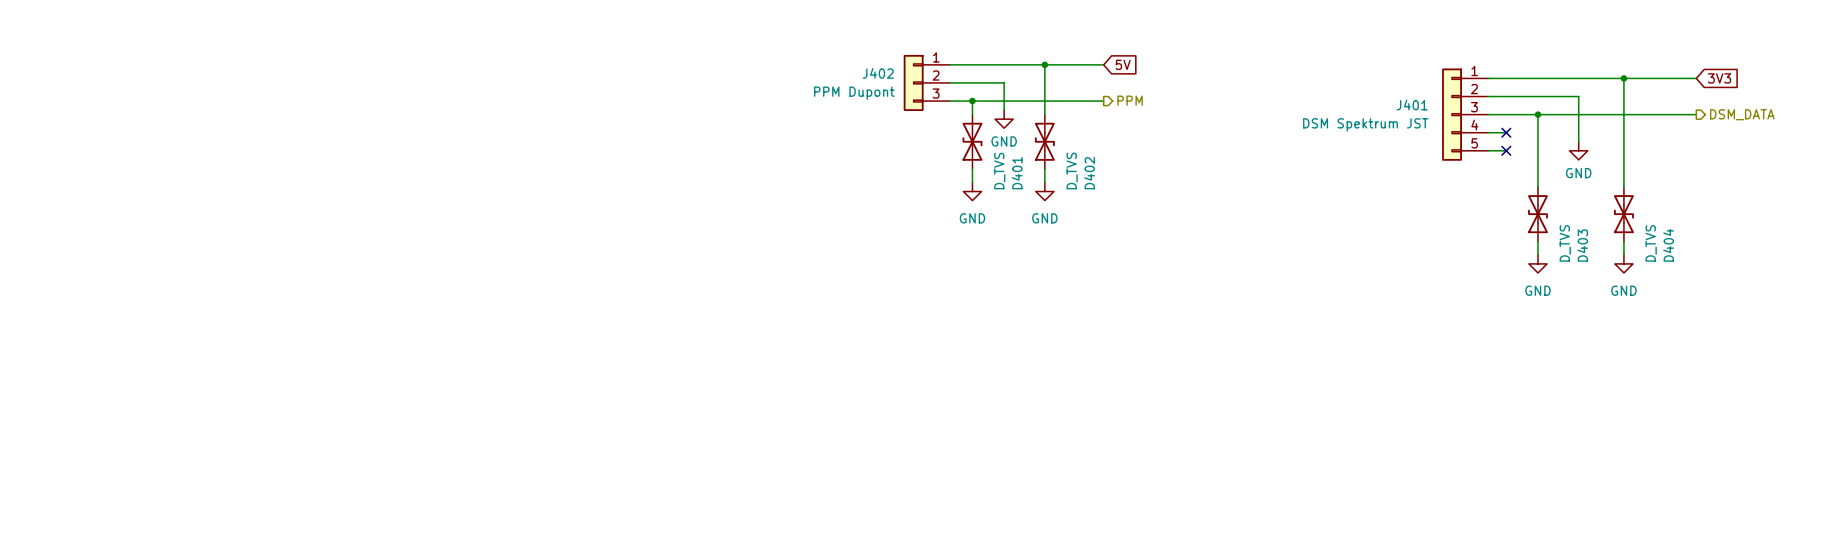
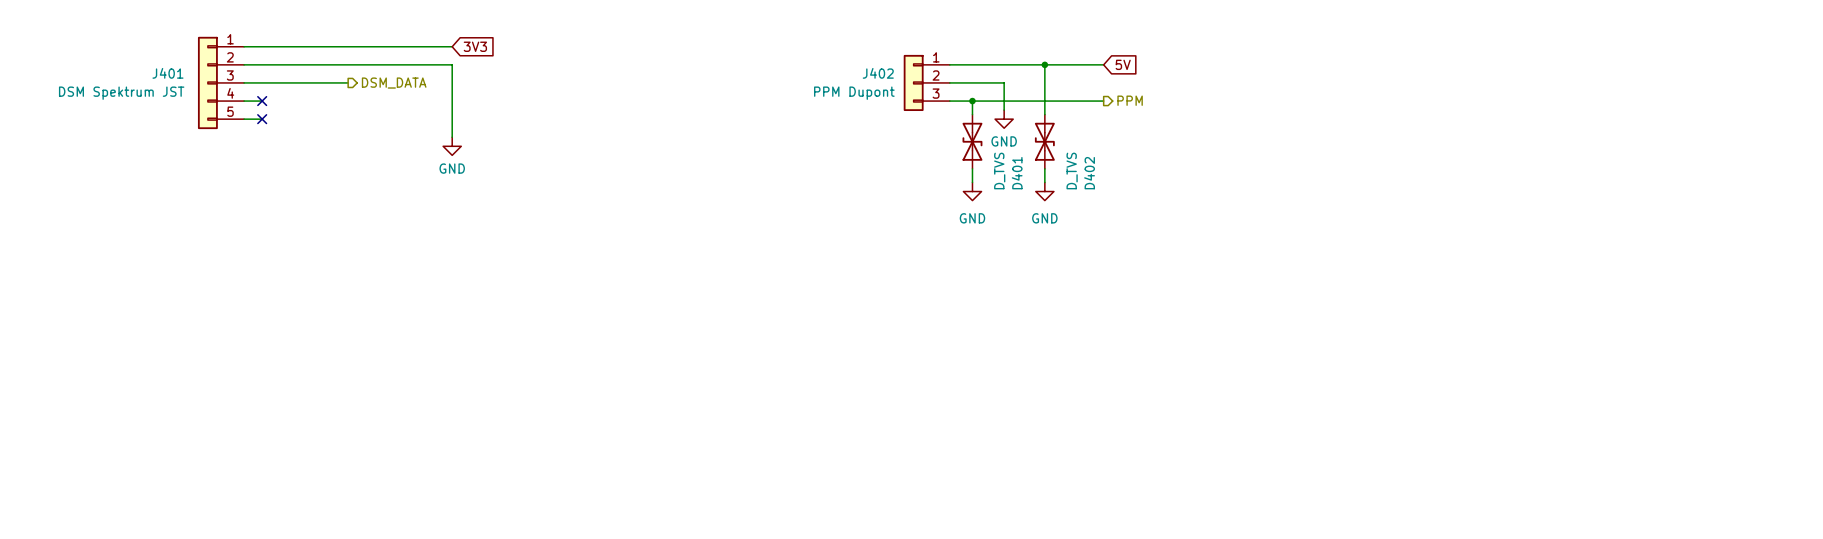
wire: none -> (244, 46) (452, 46)
global label: none -> 3V3 (475, 46)
wire: none -> (244, 64) (452, 64) (452, 137)
wire: (1488, 78) (1696, 78) -> none
wire: (1623, 78) (1623, 187) -> none
junction: (1623, 78) -> none
global label: 3V3 (1719, 78) -> none
wire: none -> (244, 82) (348, 82)
hierarchical label: none -> DSM_DATA (394, 83)
wire: (1488, 96) (1578, 96) (1578, 141) -> none
wire: none -> (244, 101) (262, 101)
no-connect mark: none -> (262, 101)
J401 position: (1465, 114) -> (221, 82)
wire: (1488, 114) (1696, 114) -> none
wire: (1537, 114) (1537, 187) -> none
junction: (1537, 114) -> none
hierarchical label: DSM_DATA (1742, 114) -> none
wire: none -> (244, 119) (262, 119)
no-connect mark: none -> (262, 119)
wire: (1488, 132) (1506, 132) -> none
no-connect mark: (1506, 132) -> none
power symbol: none -> GND (452, 146)
wire: (1488, 150) (1506, 150) -> none
no-connect mark: (1506, 150) -> none
power symbol: GND (1578, 150) -> none
D403: D_TVS (1537, 214) -> none
D404: D_TVS (1623, 214) -> none
wire: (1537, 241) (1537, 254) -> none
wire: (1623, 241) (1623, 254) -> none
power symbol: GND (1537, 263) -> none
power symbol: GND (1623, 263) -> none

